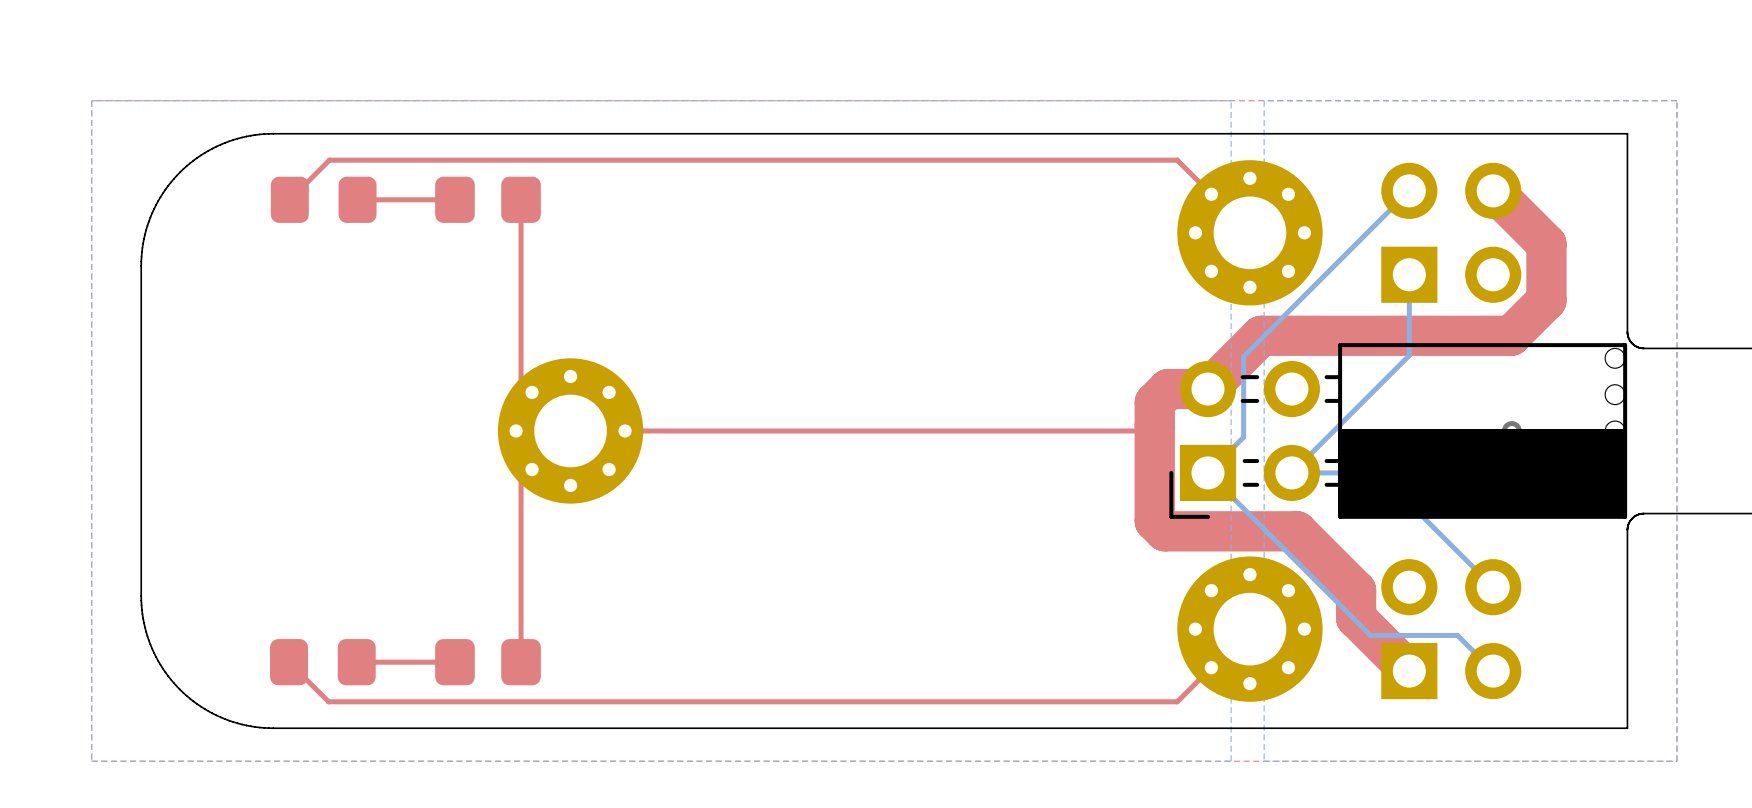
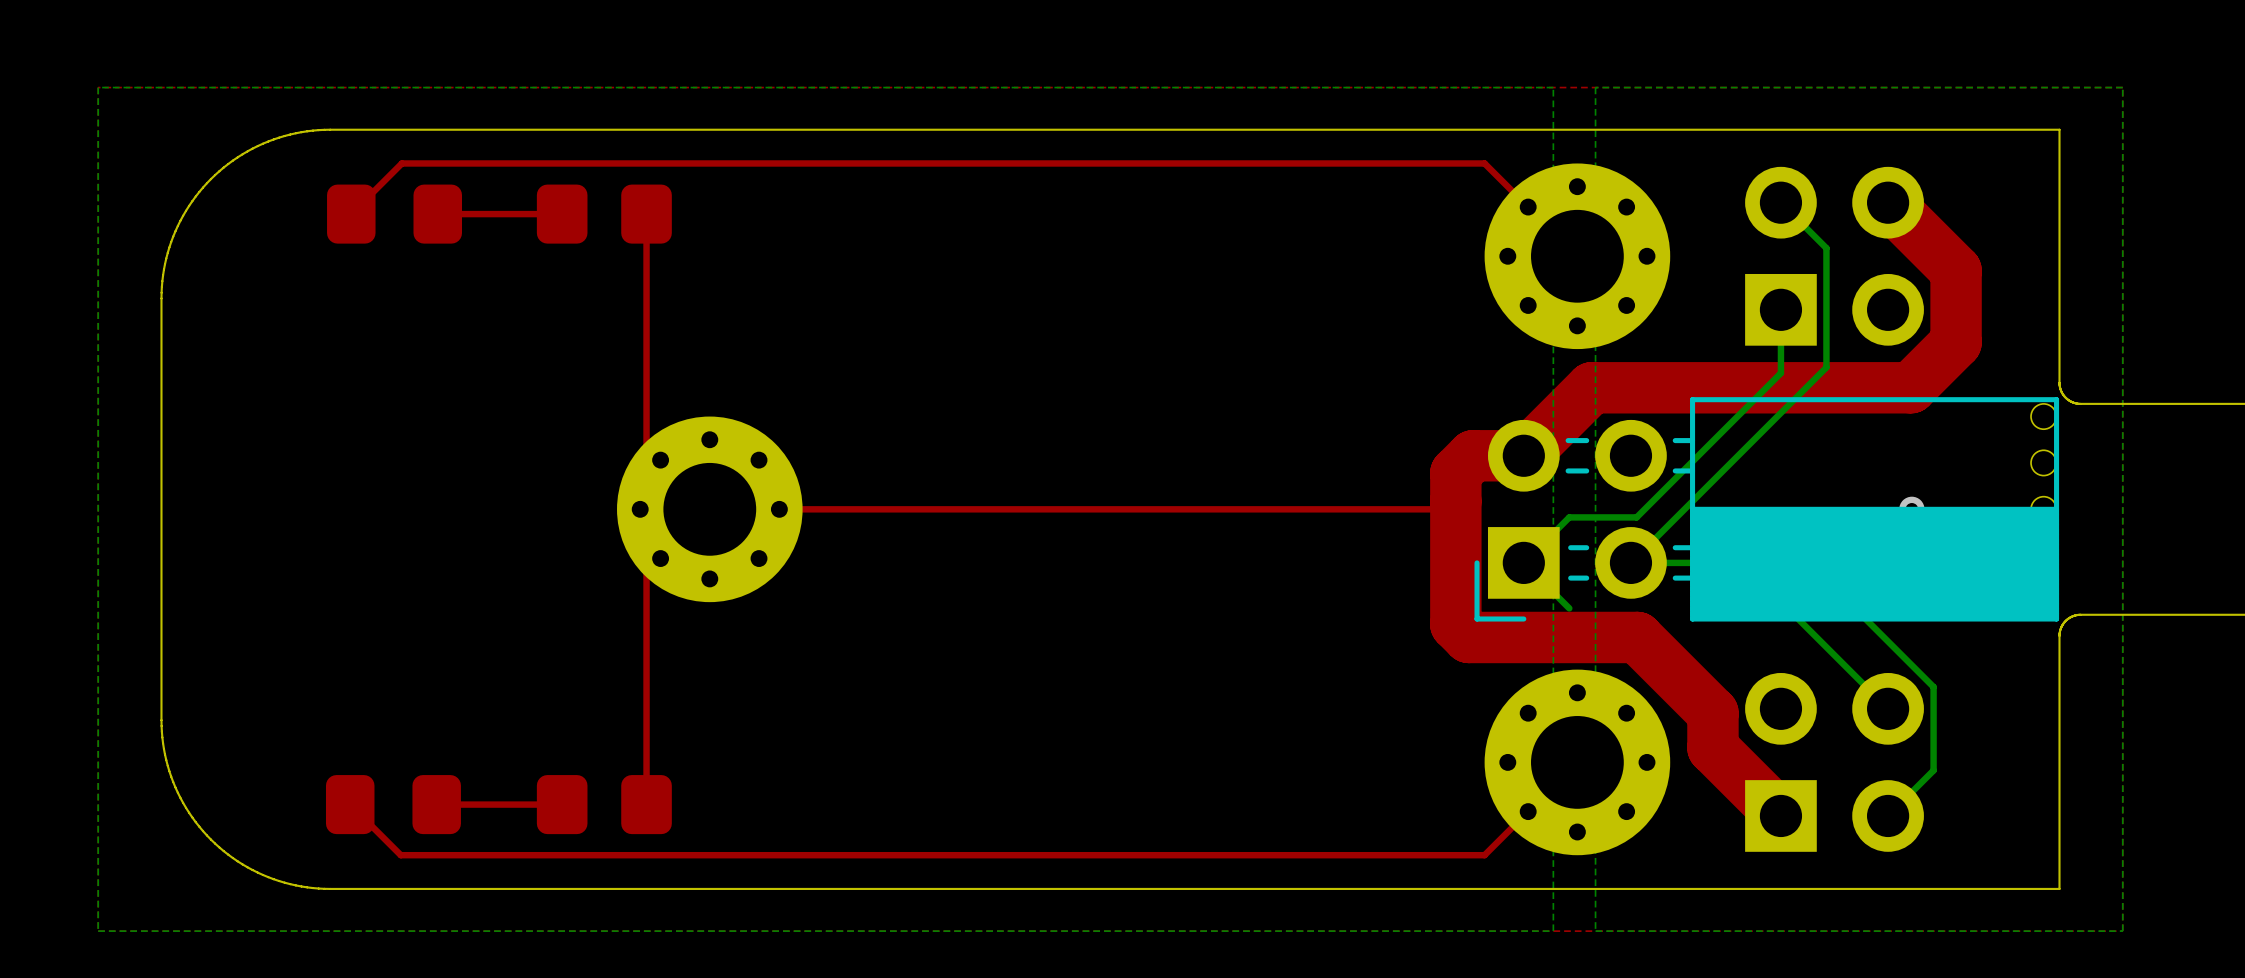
bottom track: (1409, 190) (1243, 356) (1243, 437) -> (1780, 373) (1636, 517) (1569, 517)
bottom track: (1409, 324) (1409, 355) -> (1780, 202) (1826, 248) (1826, 367) (1780, 412)
bottom track: (1243, 508) (1370, 635) (1457, 635) (1493, 671) -> (1742, 562) (1809, 562) (1933, 687) (1933, 770) (1888, 815)

